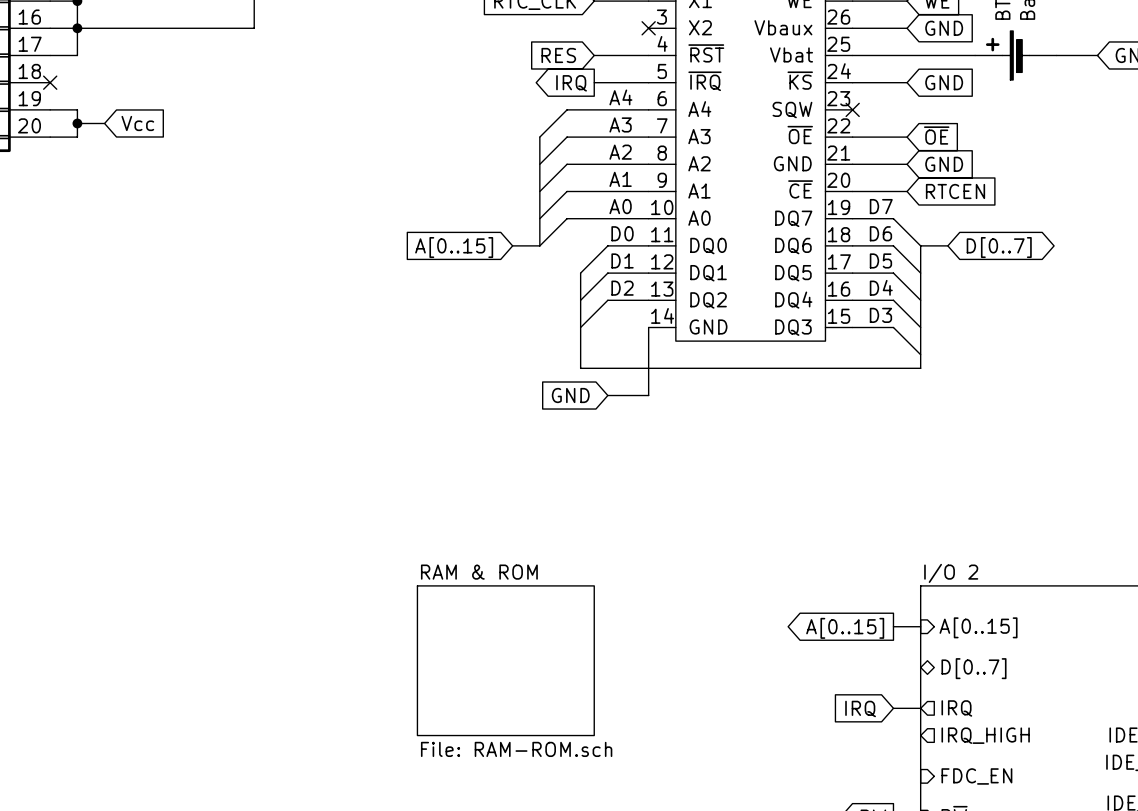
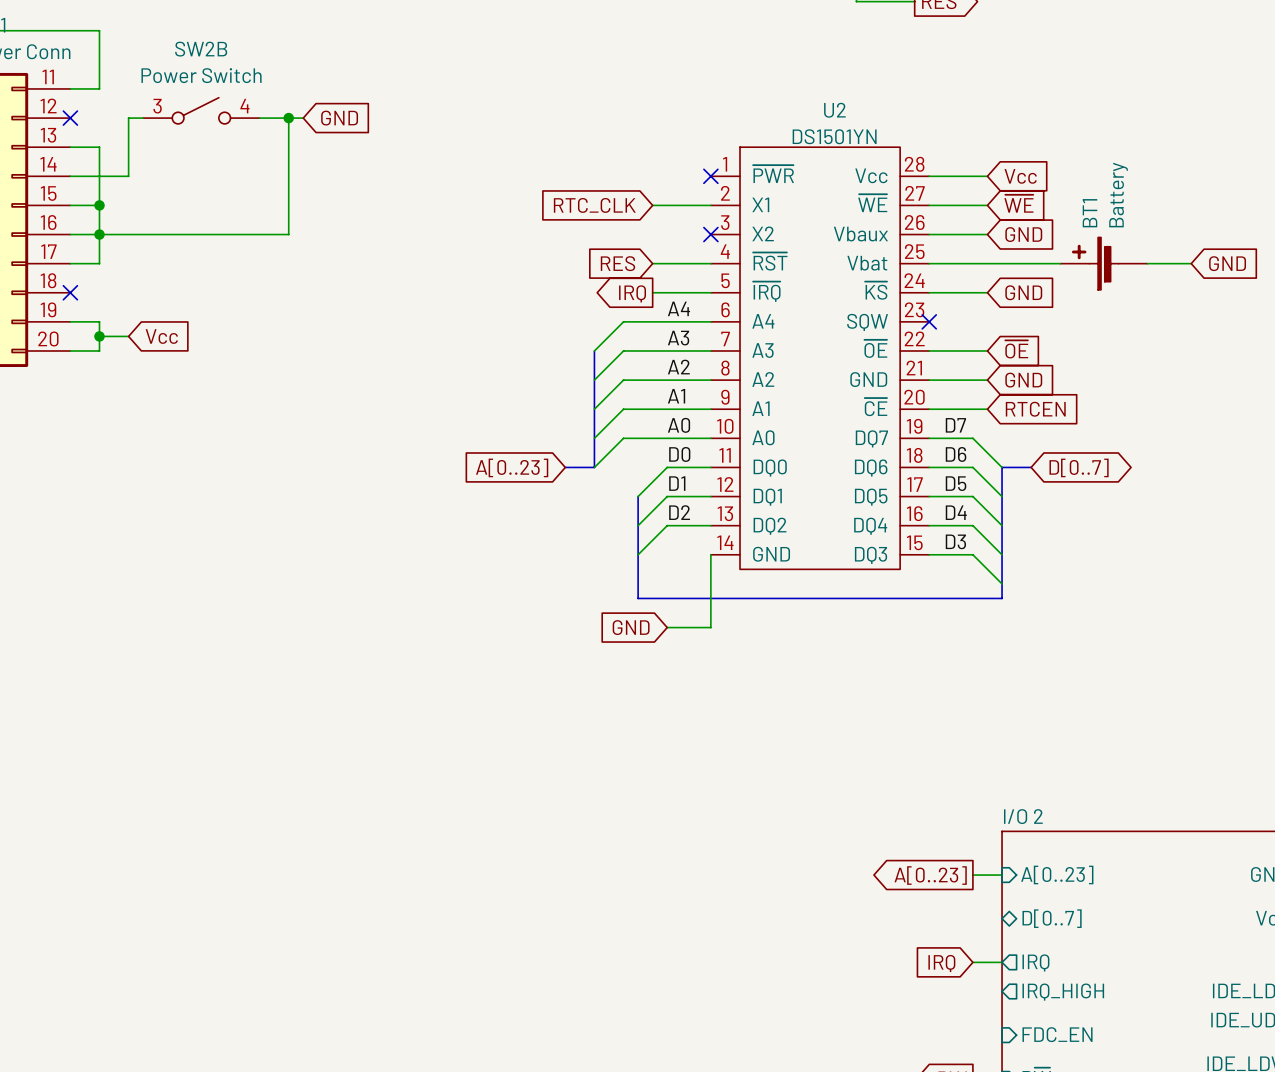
global label: A[0..15] (454, 247) -> A[0..23] (512, 467)
sheet pin: A[0..15] (978, 627) -> A[0..23] (1057, 874)
global label: A[0..15] (845, 628) -> A[0..23] (930, 875)
sheet RAM & ROM: File: RAM-ROM.sch (505, 660) -> none

